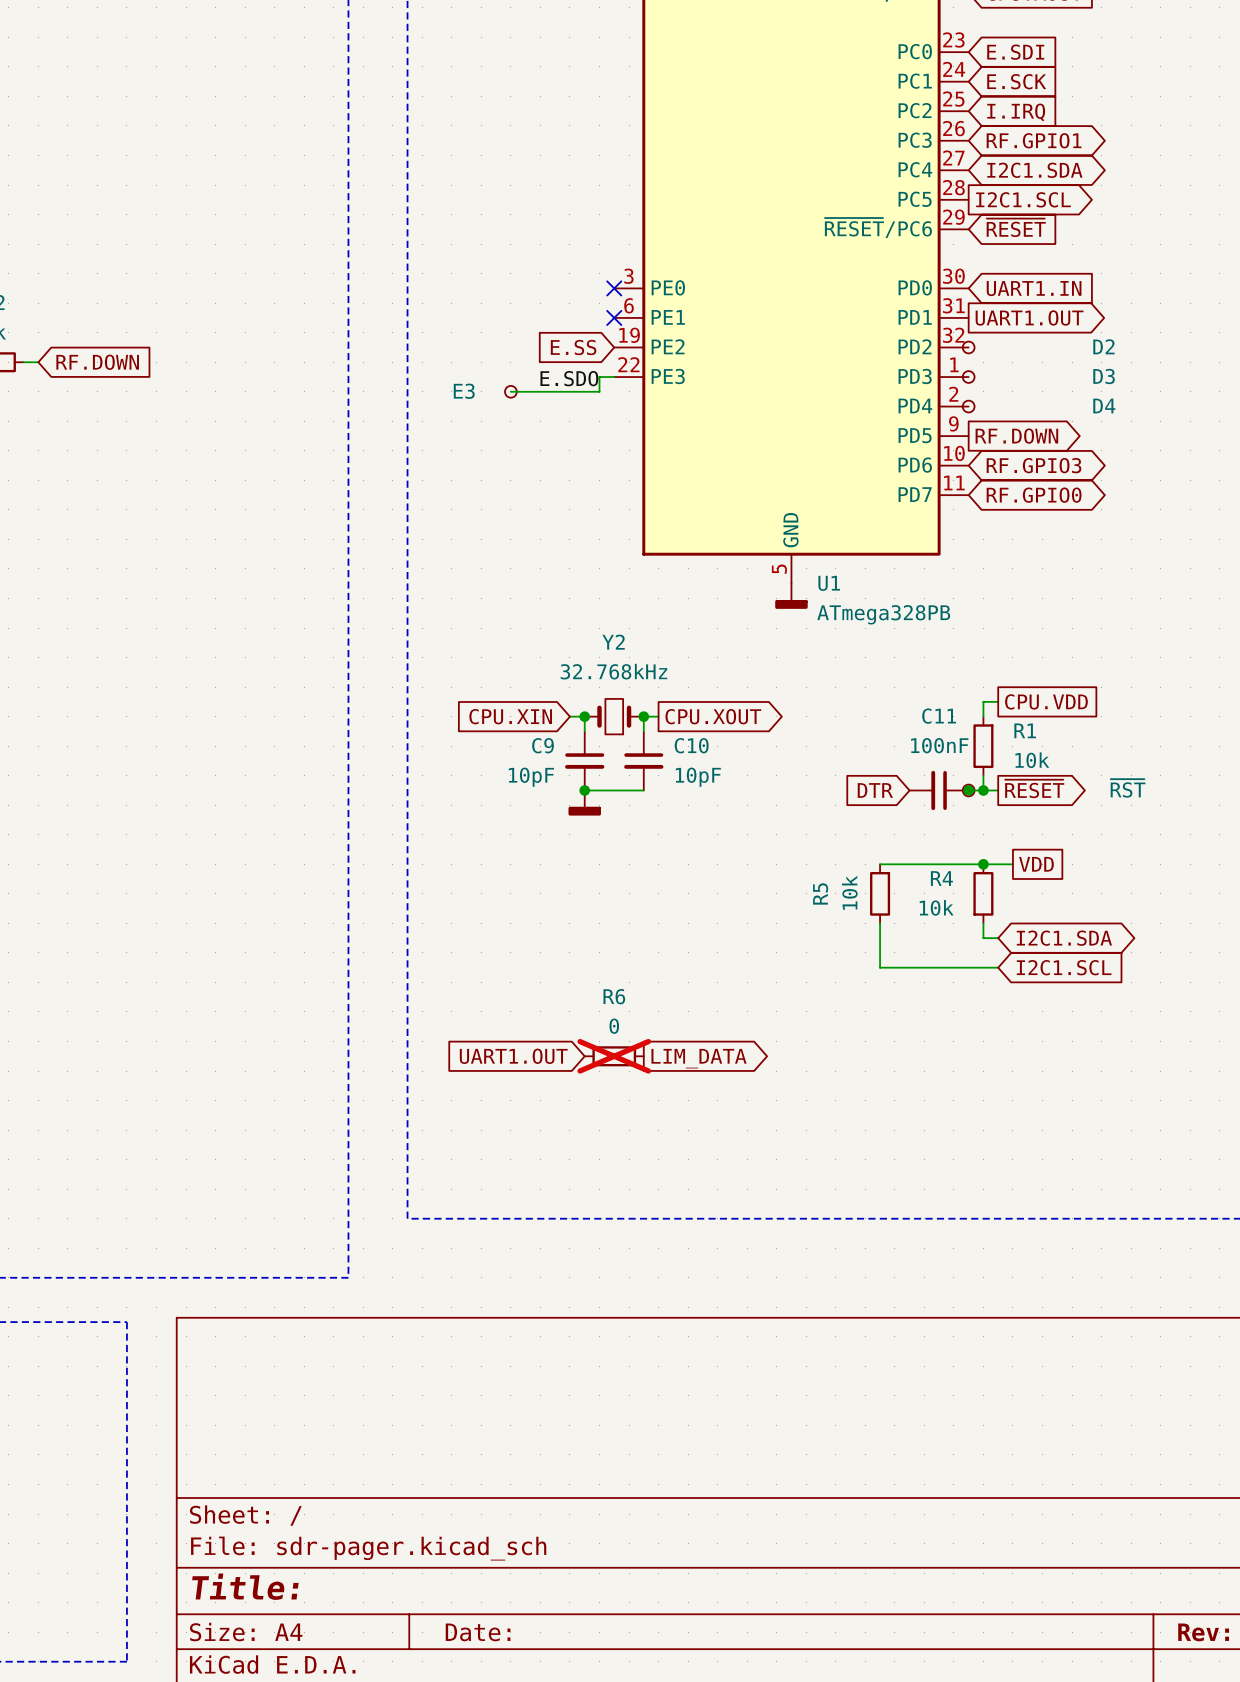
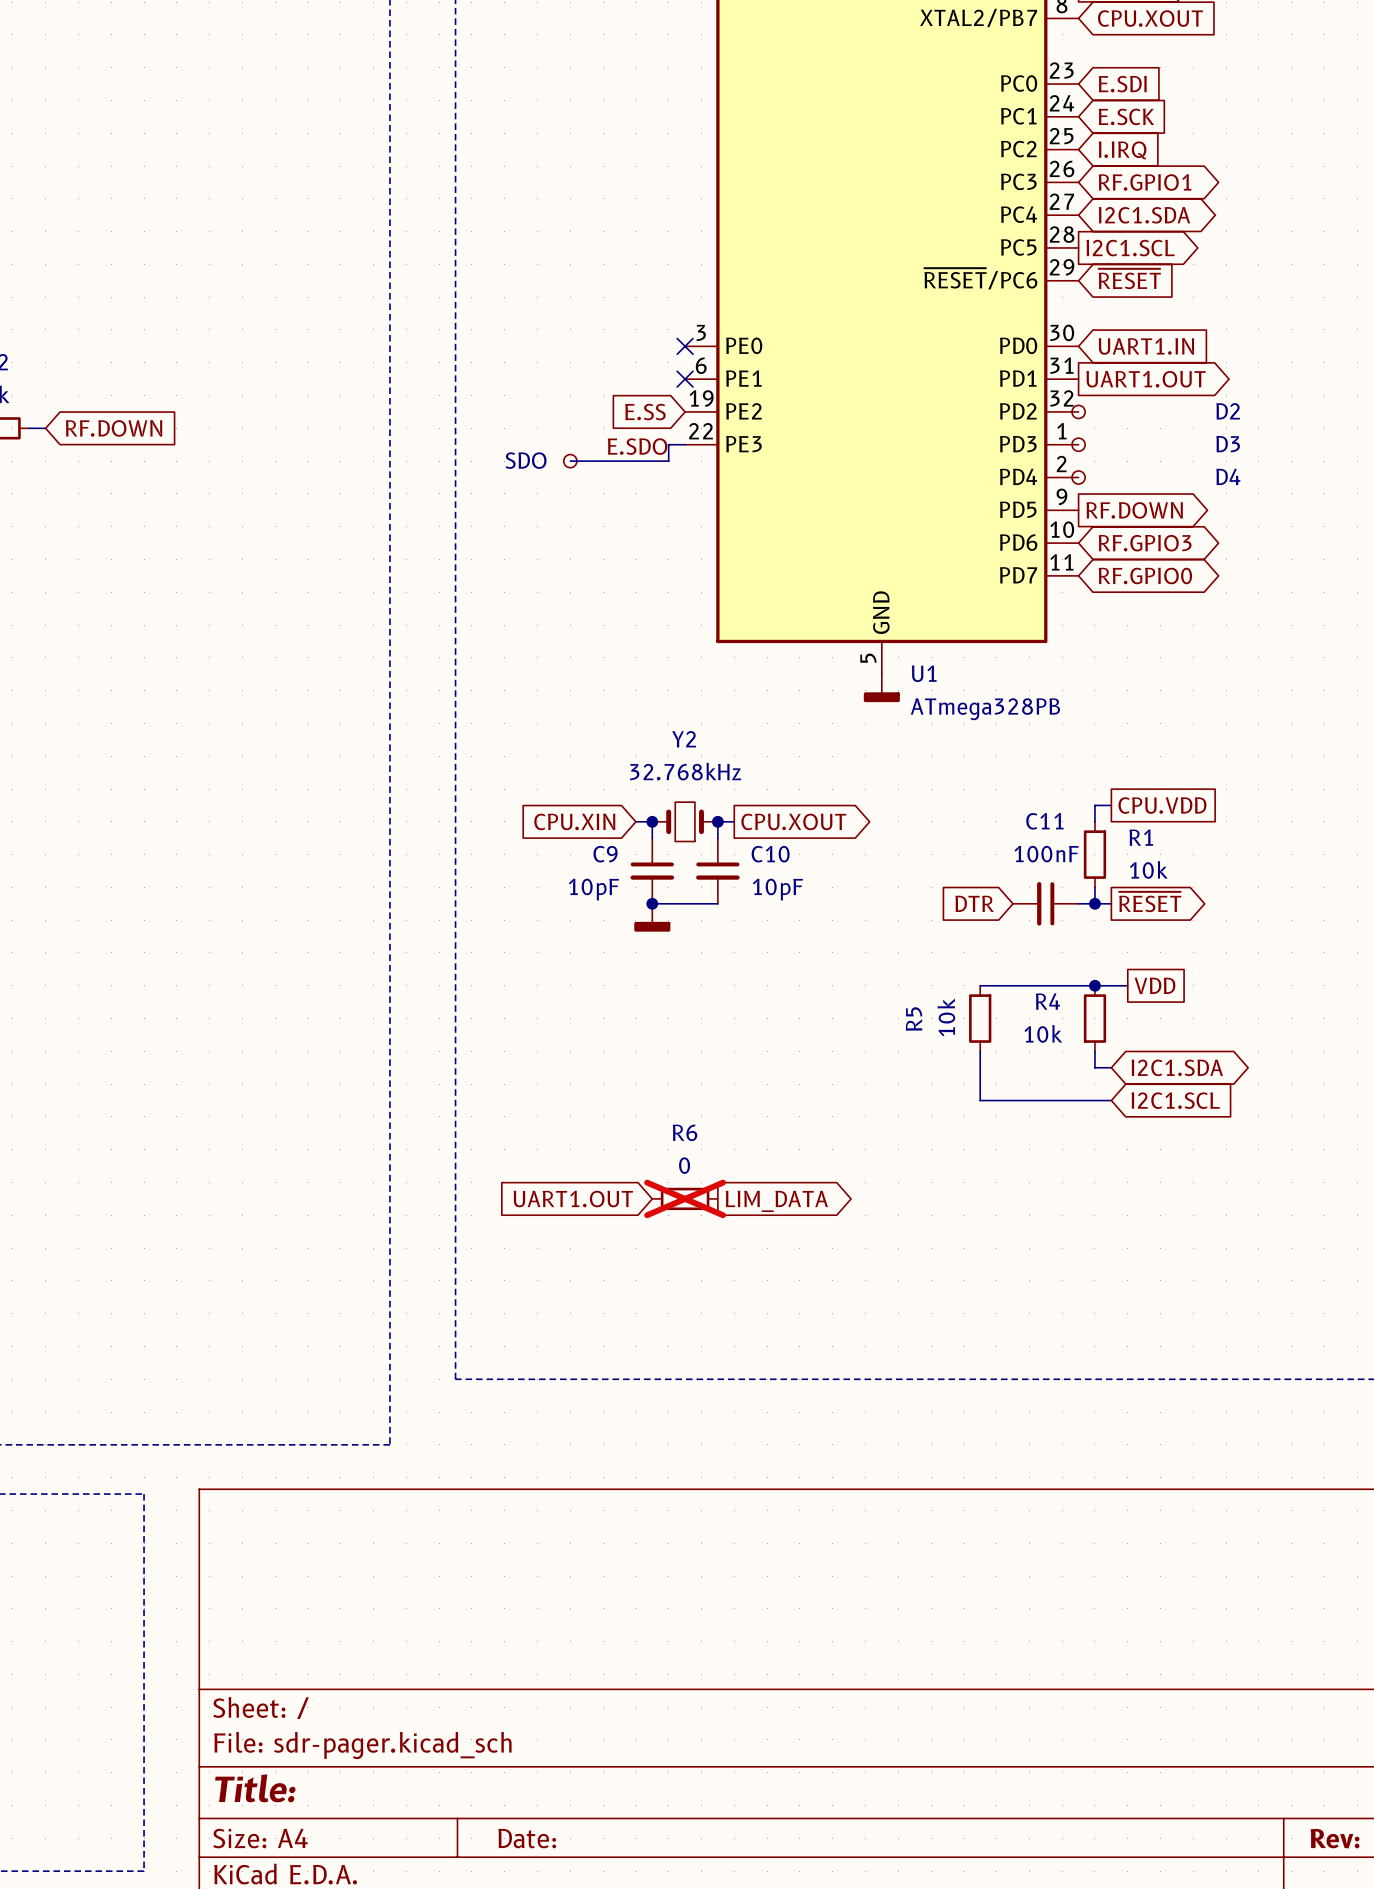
part value: E3 (464, 391) -> SDO (526, 460)
junction: (968, 790) -> none
part: ~{RST} (968, 790) -> none

